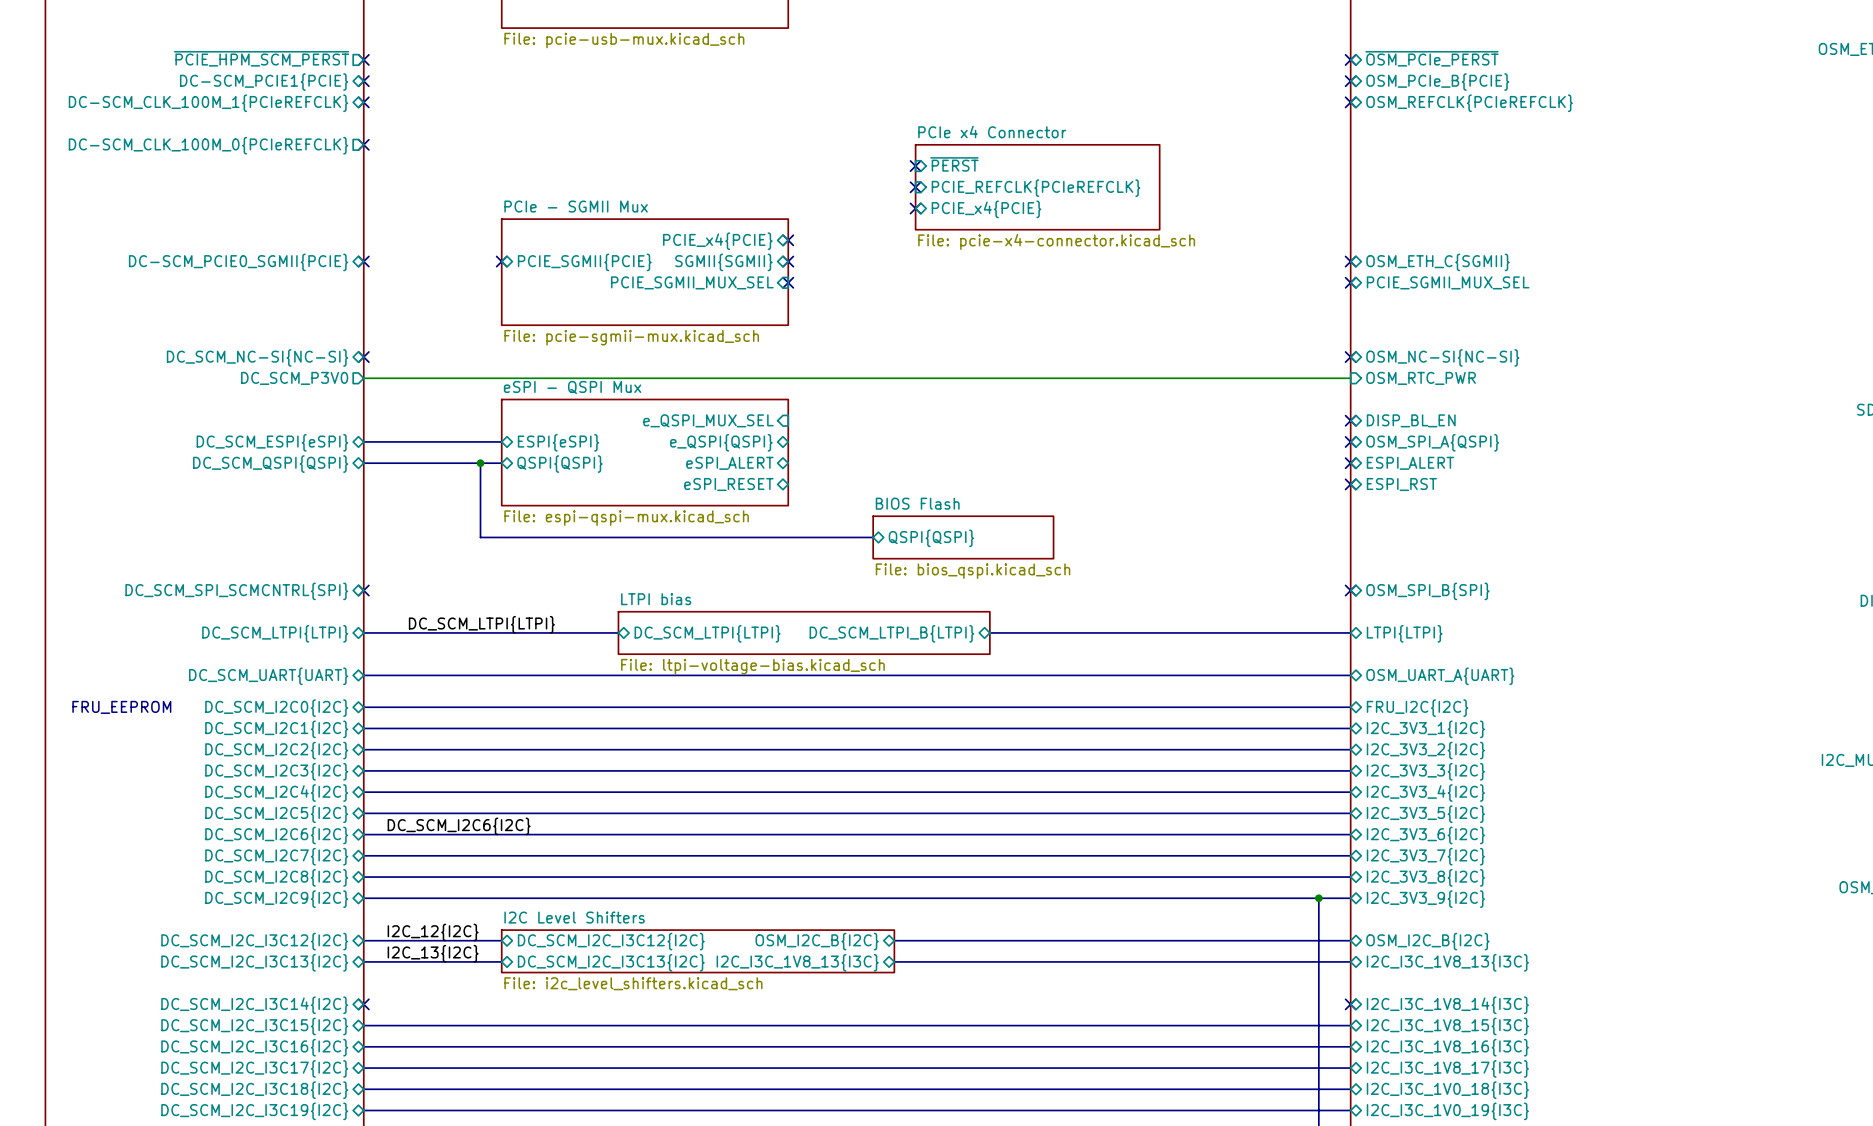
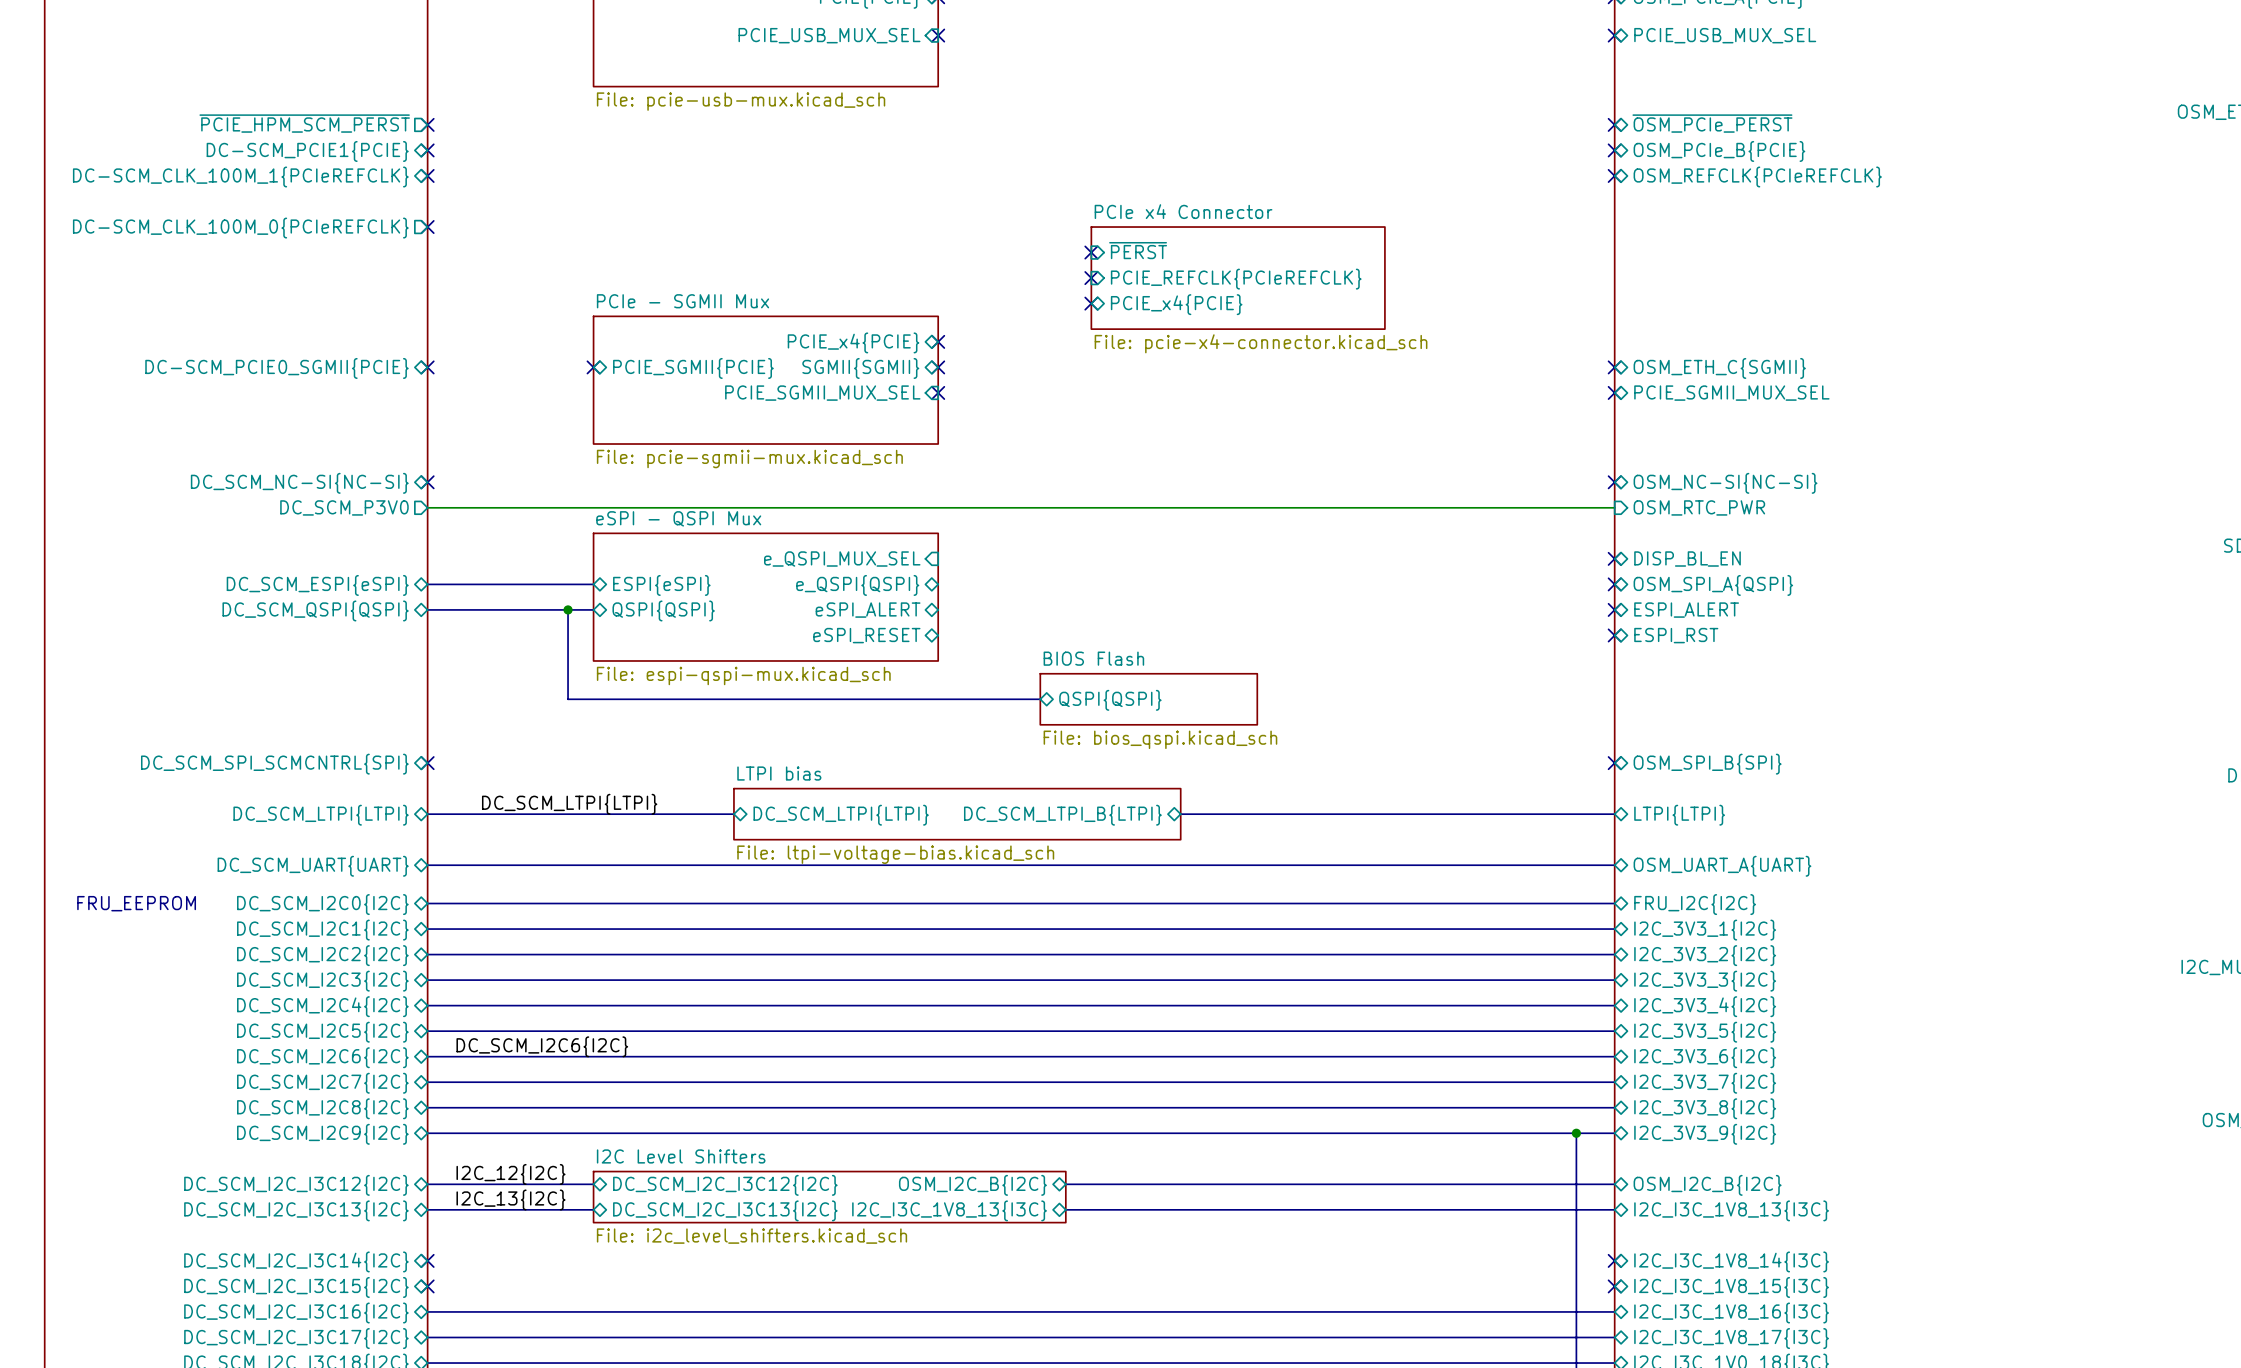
bus: (363, 1025) (1350, 1025) -> none
no-connect mark: none -> (427, 1286)
no-connect mark: none -> (1614, 1286)

